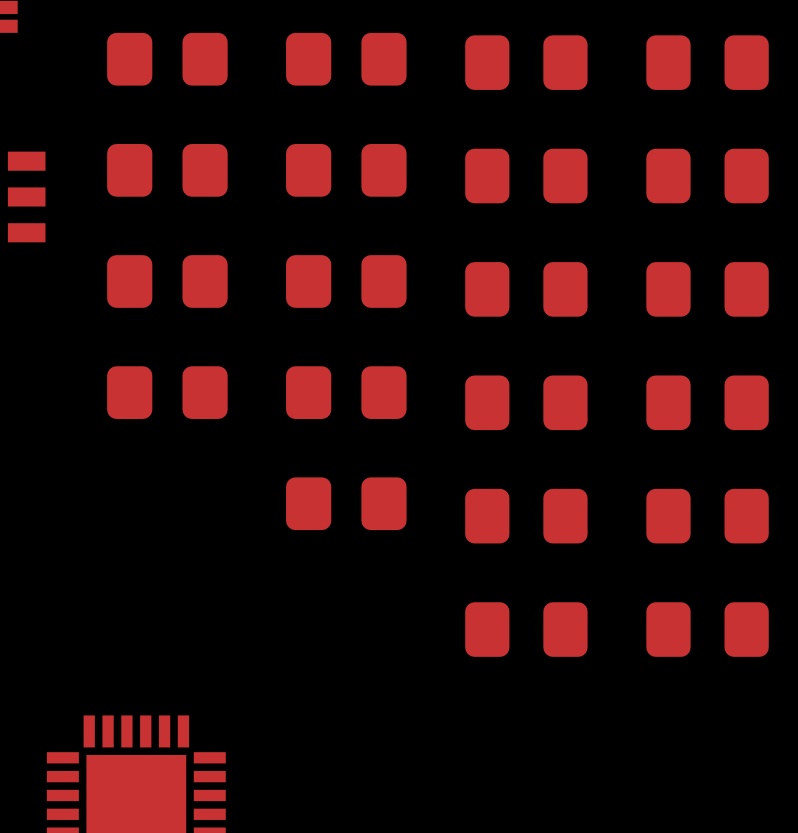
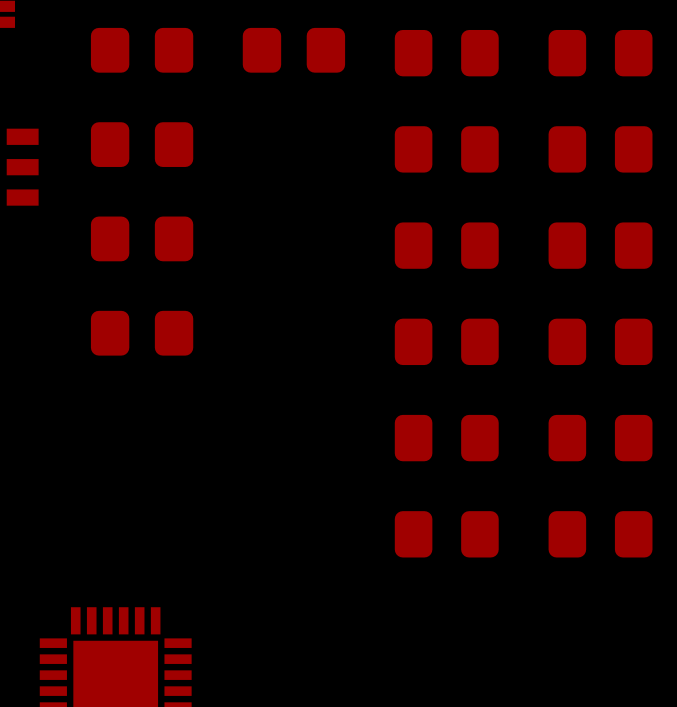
part: (346, 170) -> none
part: (346, 281) -> none
part: (346, 392) -> none
part: (346, 503) -> none

